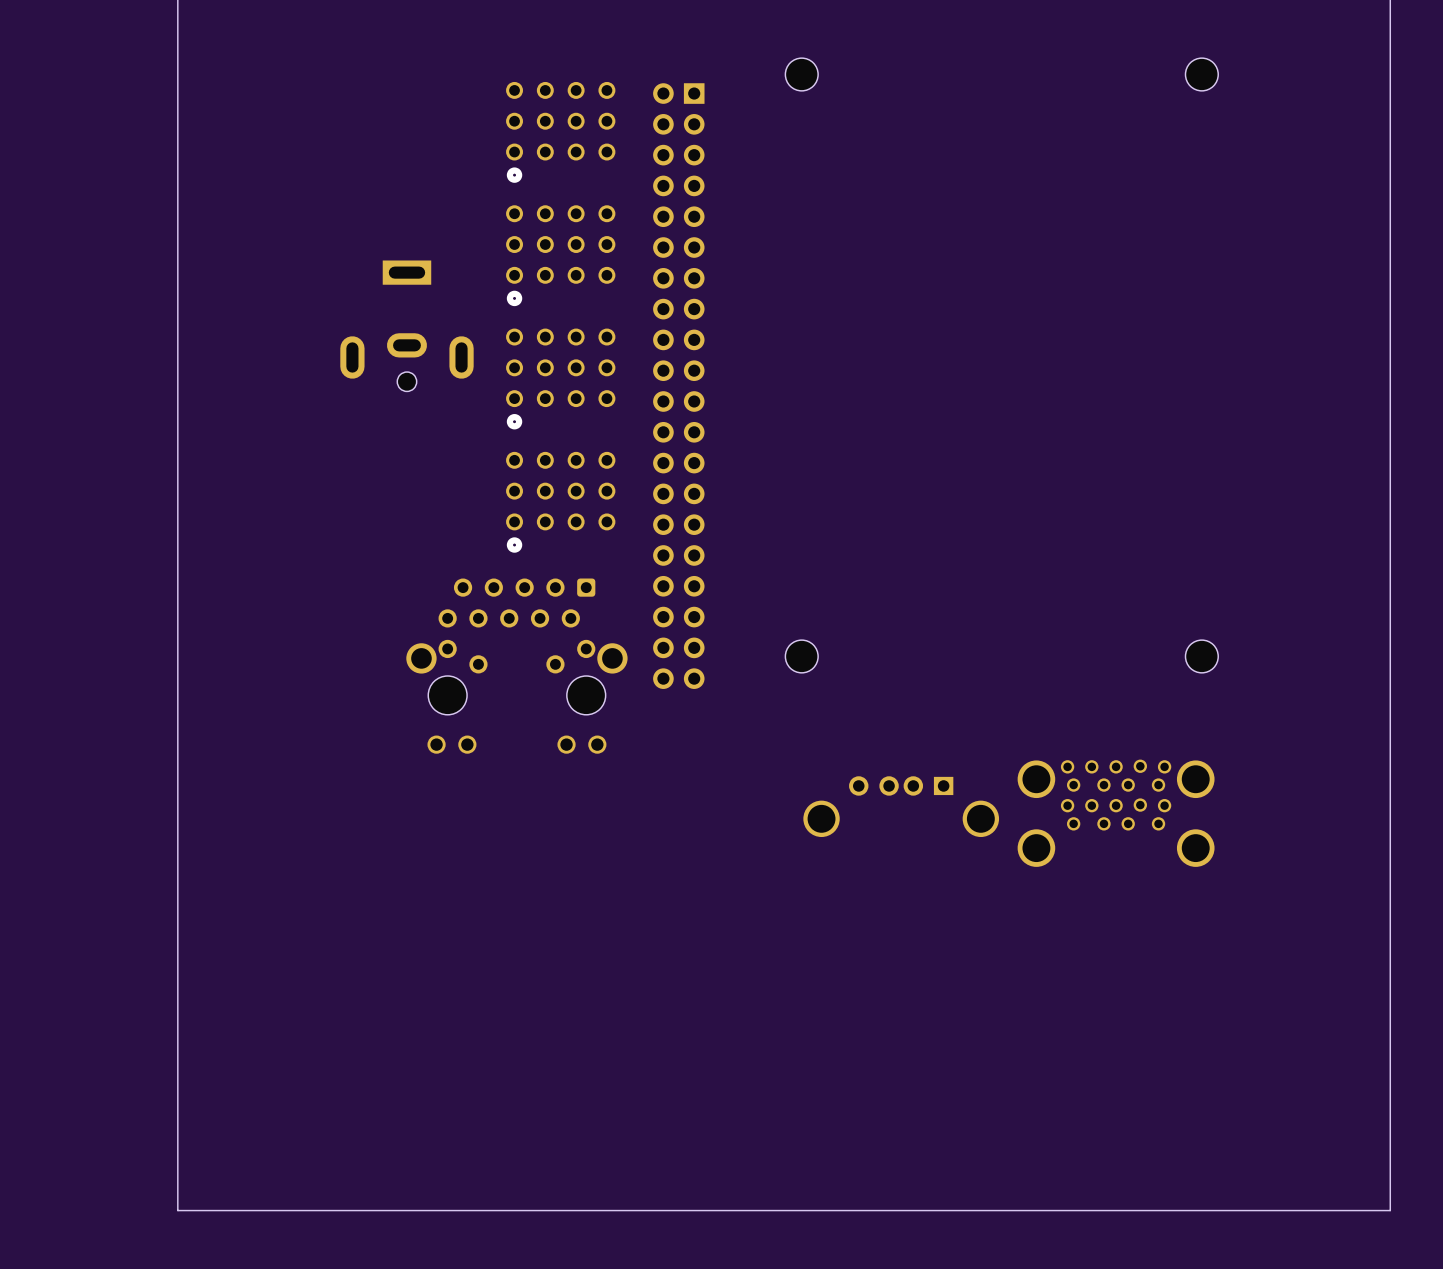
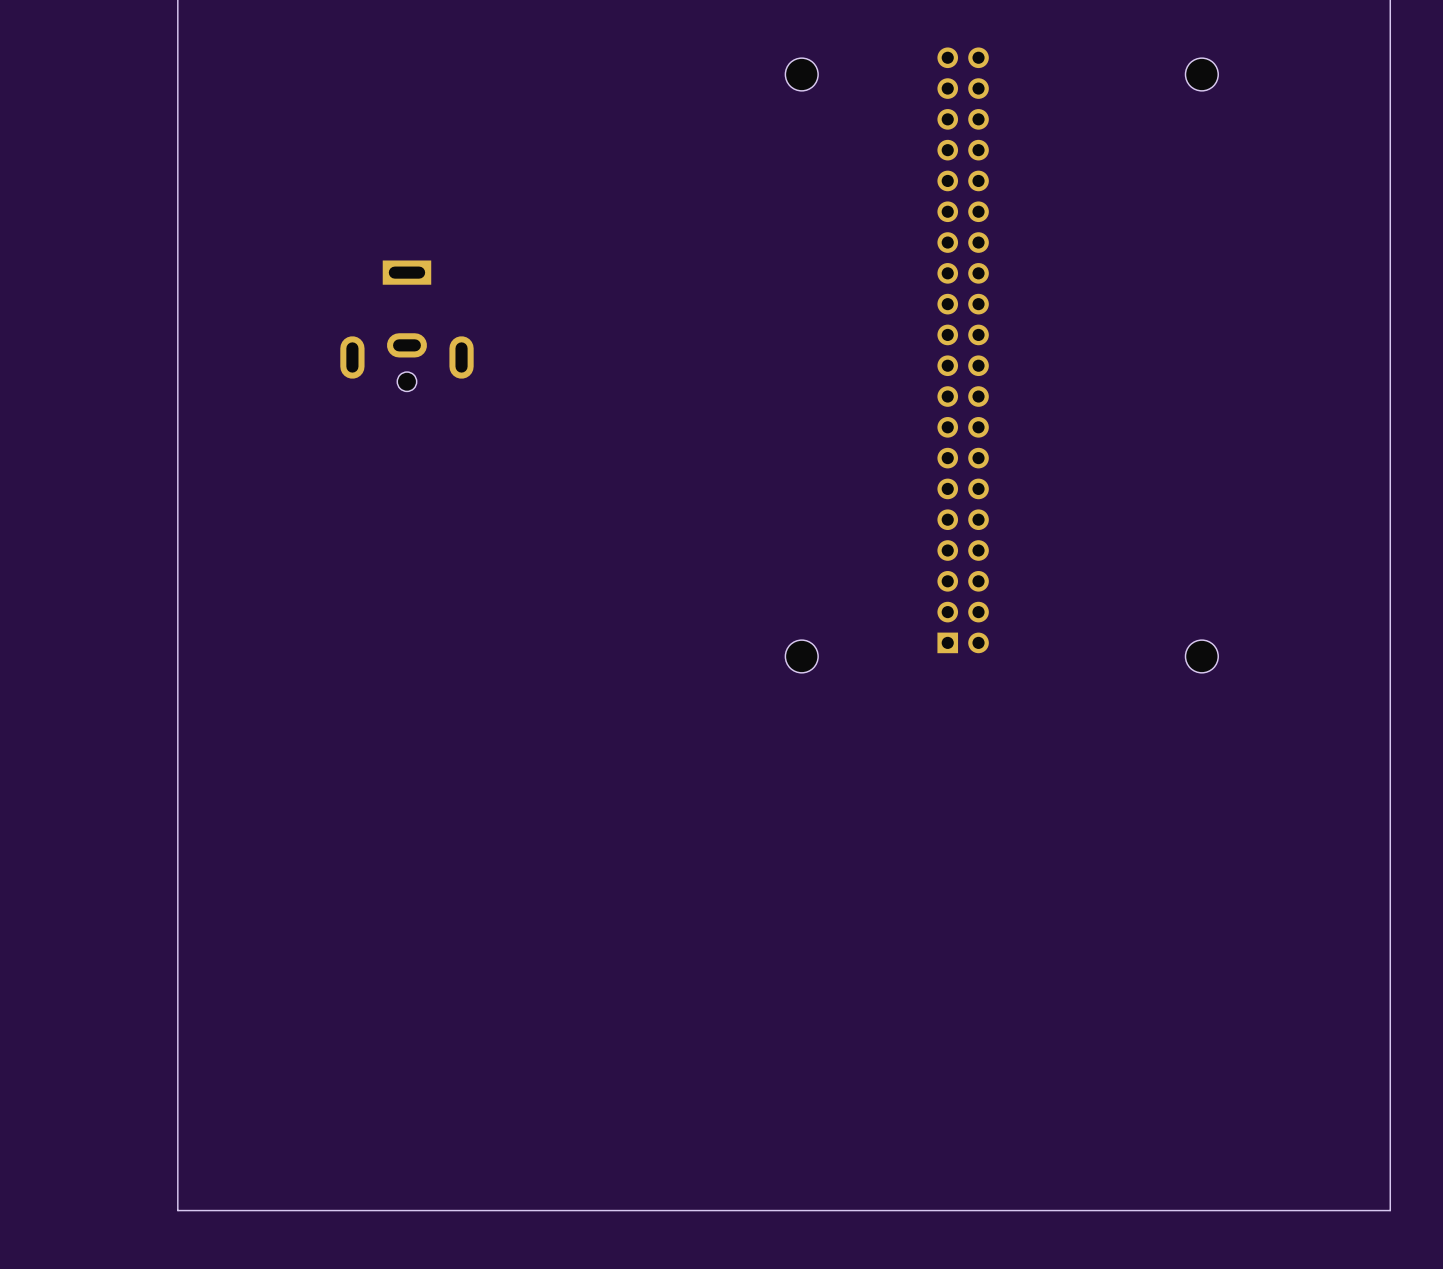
part: (560, 132) -> none
part: (560, 255) -> none
part: (560, 378) -> none
part rotation: 0° (678, 386) -> 180° (963, 350)
part: (560, 502) -> none
part: (516, 666) -> none
part: (901, 806) -> none
part: (1116, 813) -> none

